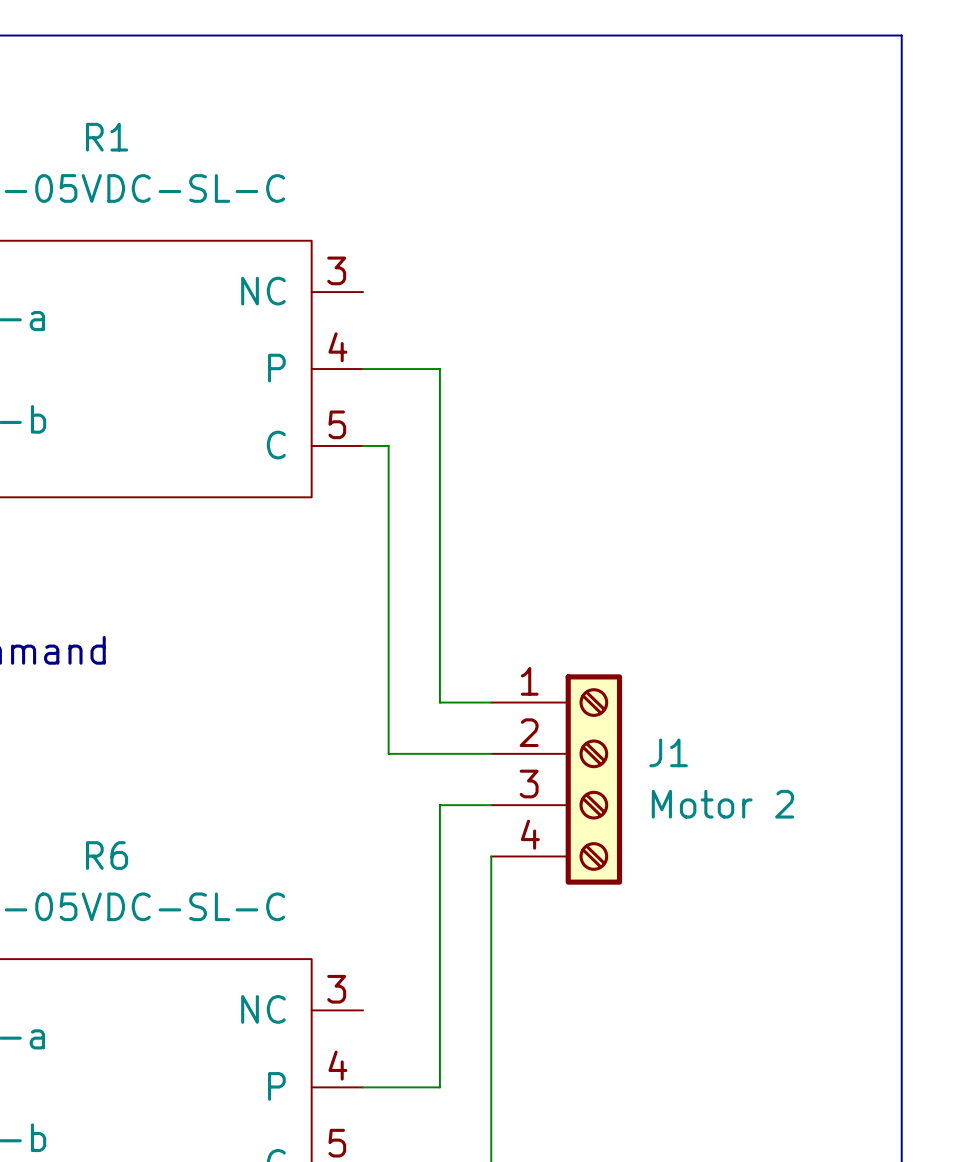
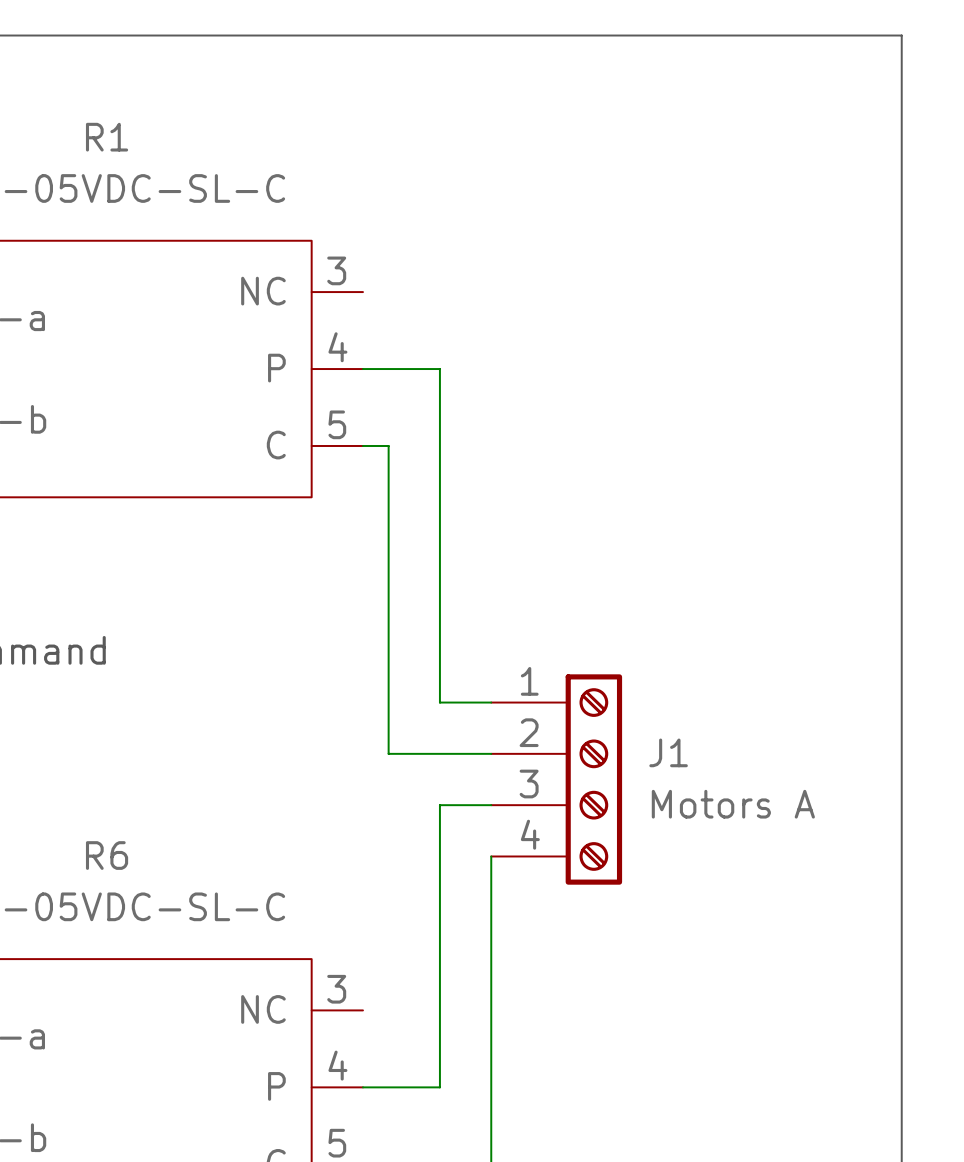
J1 value: Motor 2 (722, 804) -> Motors A (733, 804)

